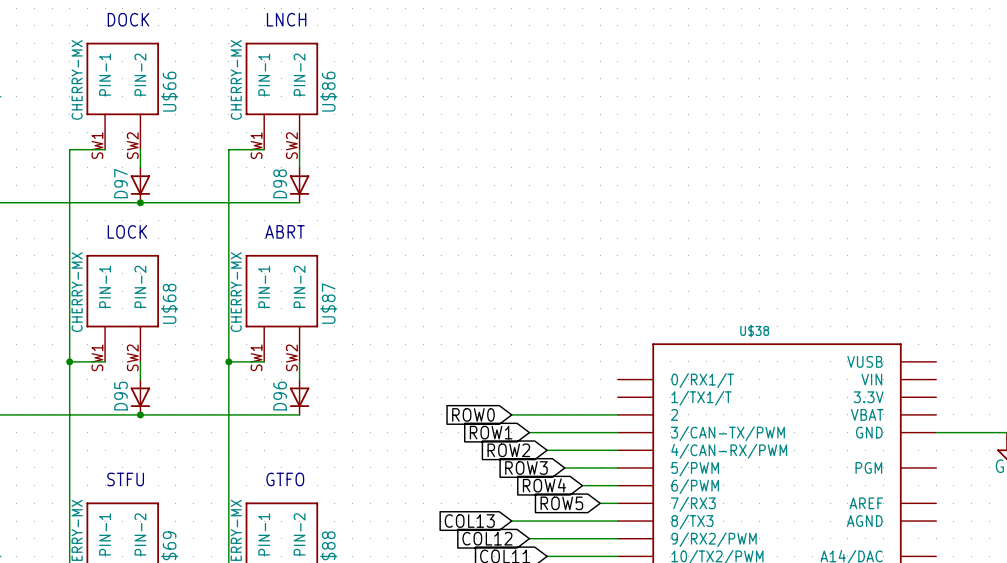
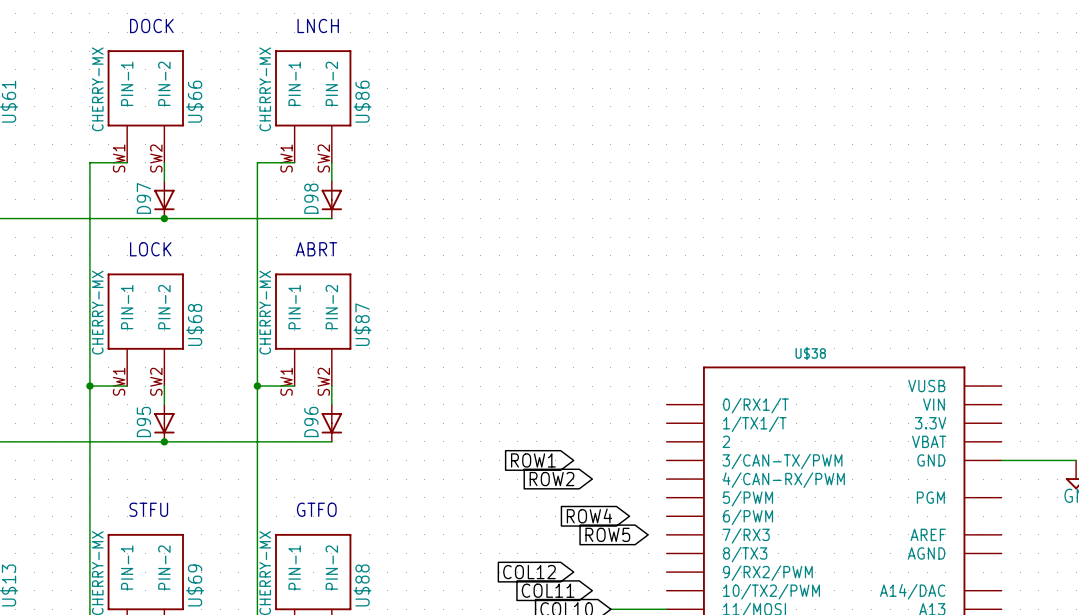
global label: ROW0 (473, 414) -> none
wire: (511, 414) (617, 414) -> none
wire: (529, 432) (617, 432) -> none
wire: (547, 450) (617, 450) -> none
global label: ROW3 (526, 467) -> none
wire: (564, 467) (617, 467) -> none
wire: (582, 485) (617, 485) -> none
wire: (600, 503) (617, 503) -> none
global label: COL13 (469, 521) -> none
wire: (511, 521) (617, 521) -> none
wire: (529, 538) (617, 538) -> none
wire: (547, 556) (617, 556) -> none

